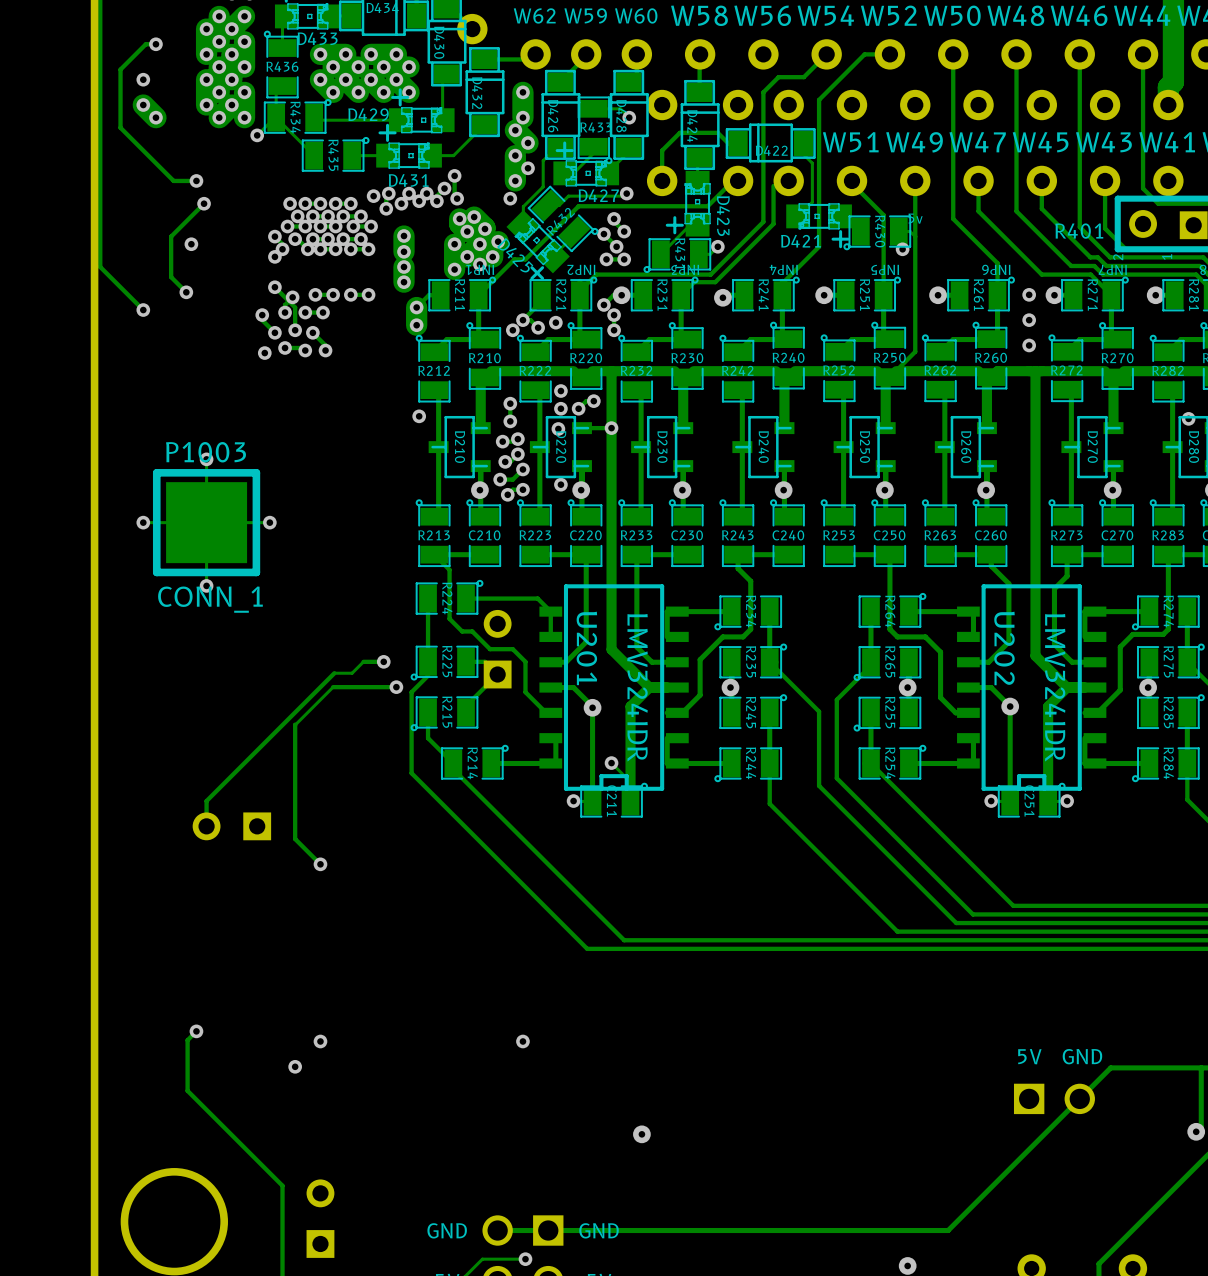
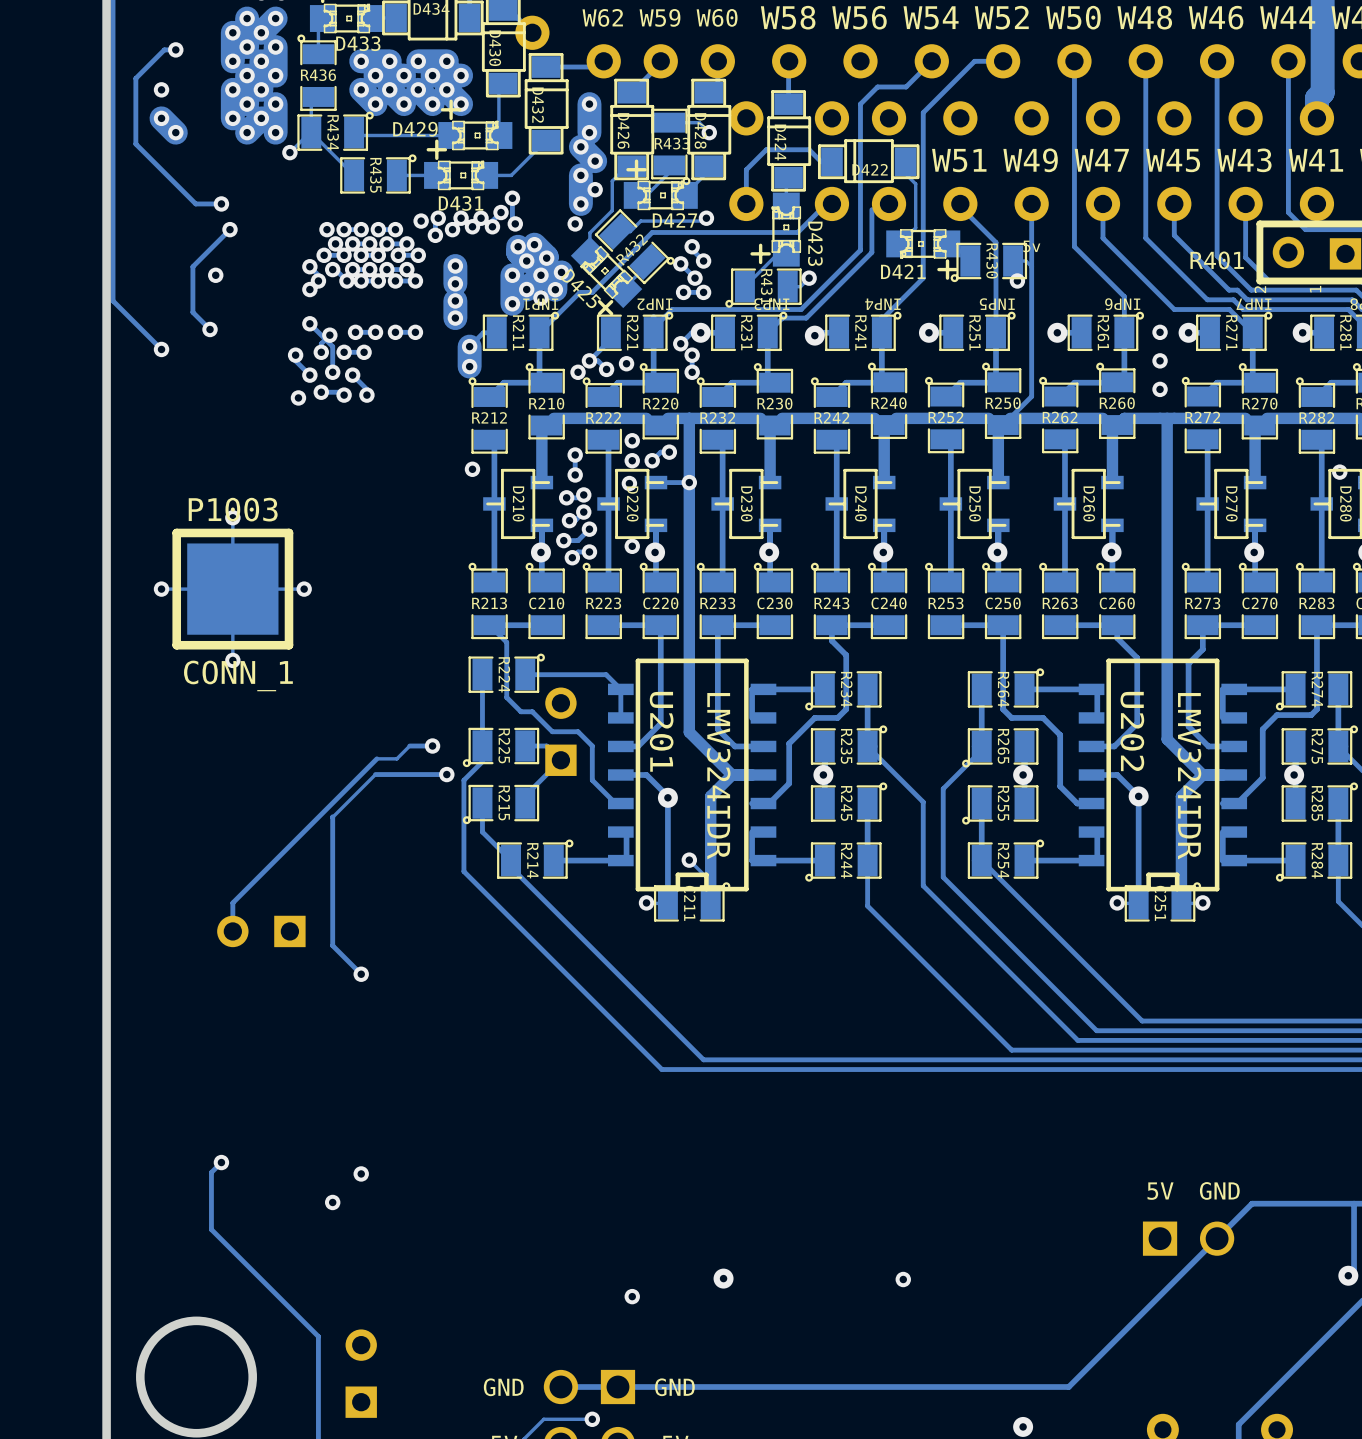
via position: (522, 1041) -> (632, 1296)
via: none -> (903, 1279)

